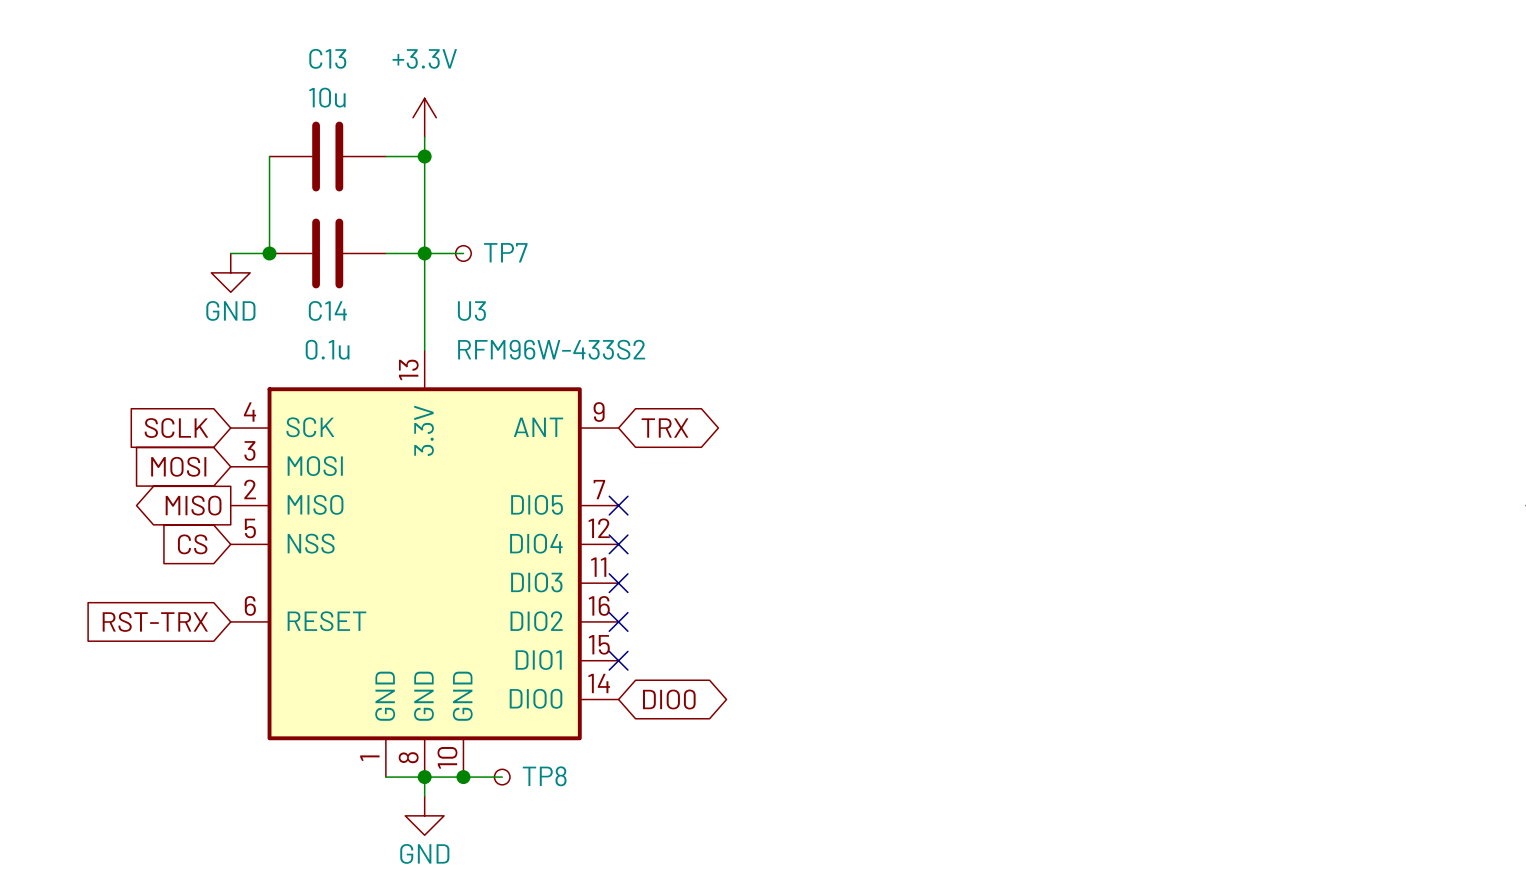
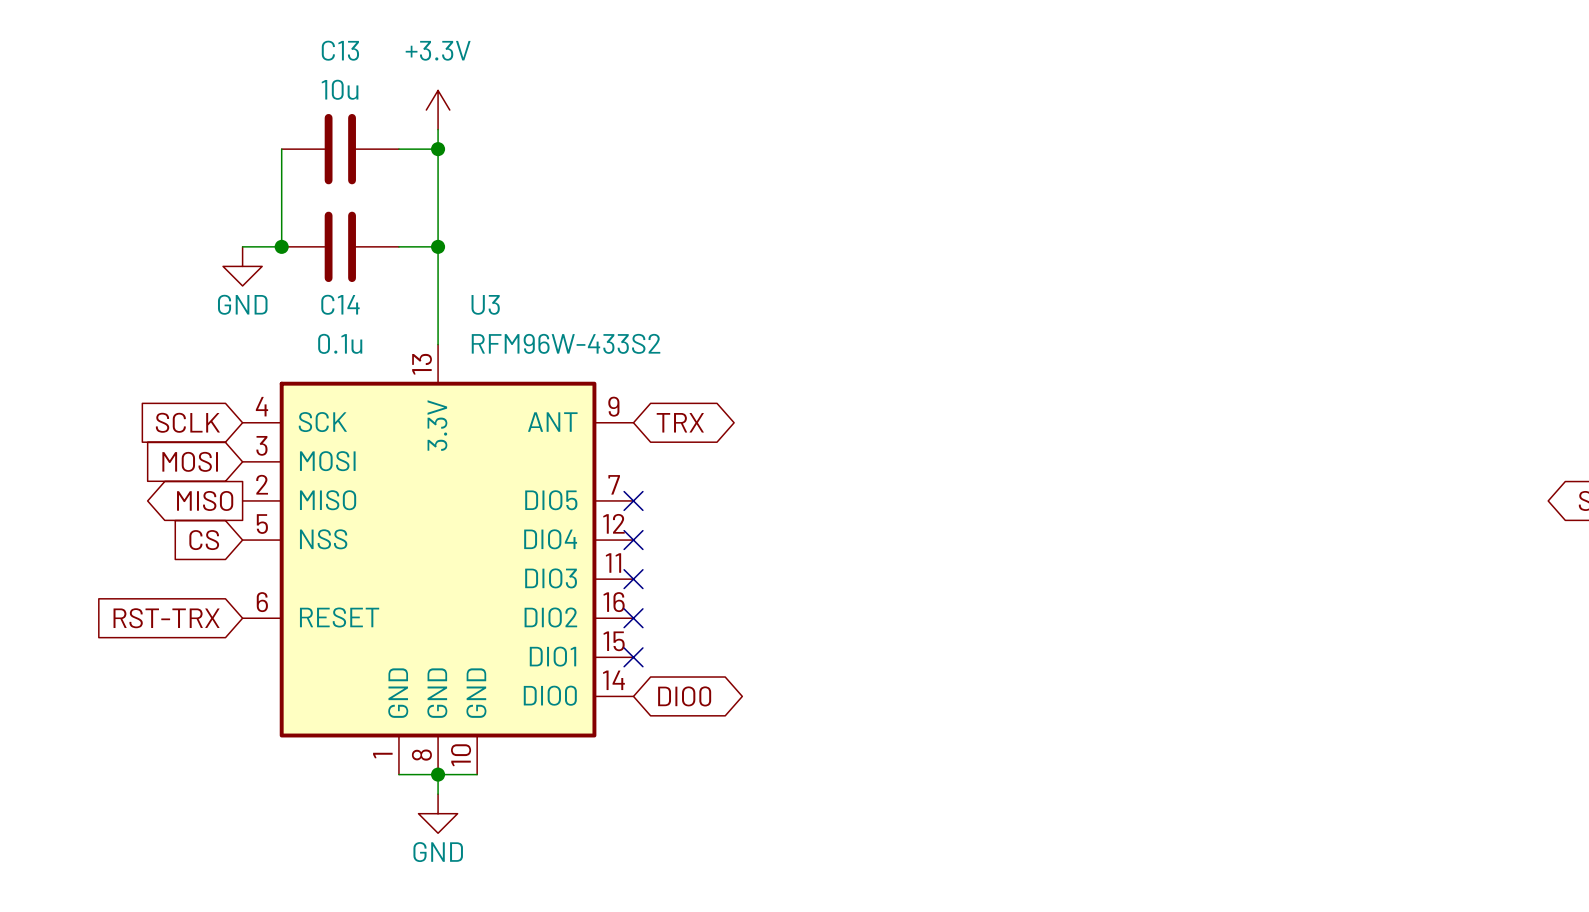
wire: (424, 253) (463, 253) -> none
TP7: (463, 253) -> none
wire: (463, 777) (502, 777) -> none
junction: (463, 777) -> none
TP8: (502, 777) -> none

